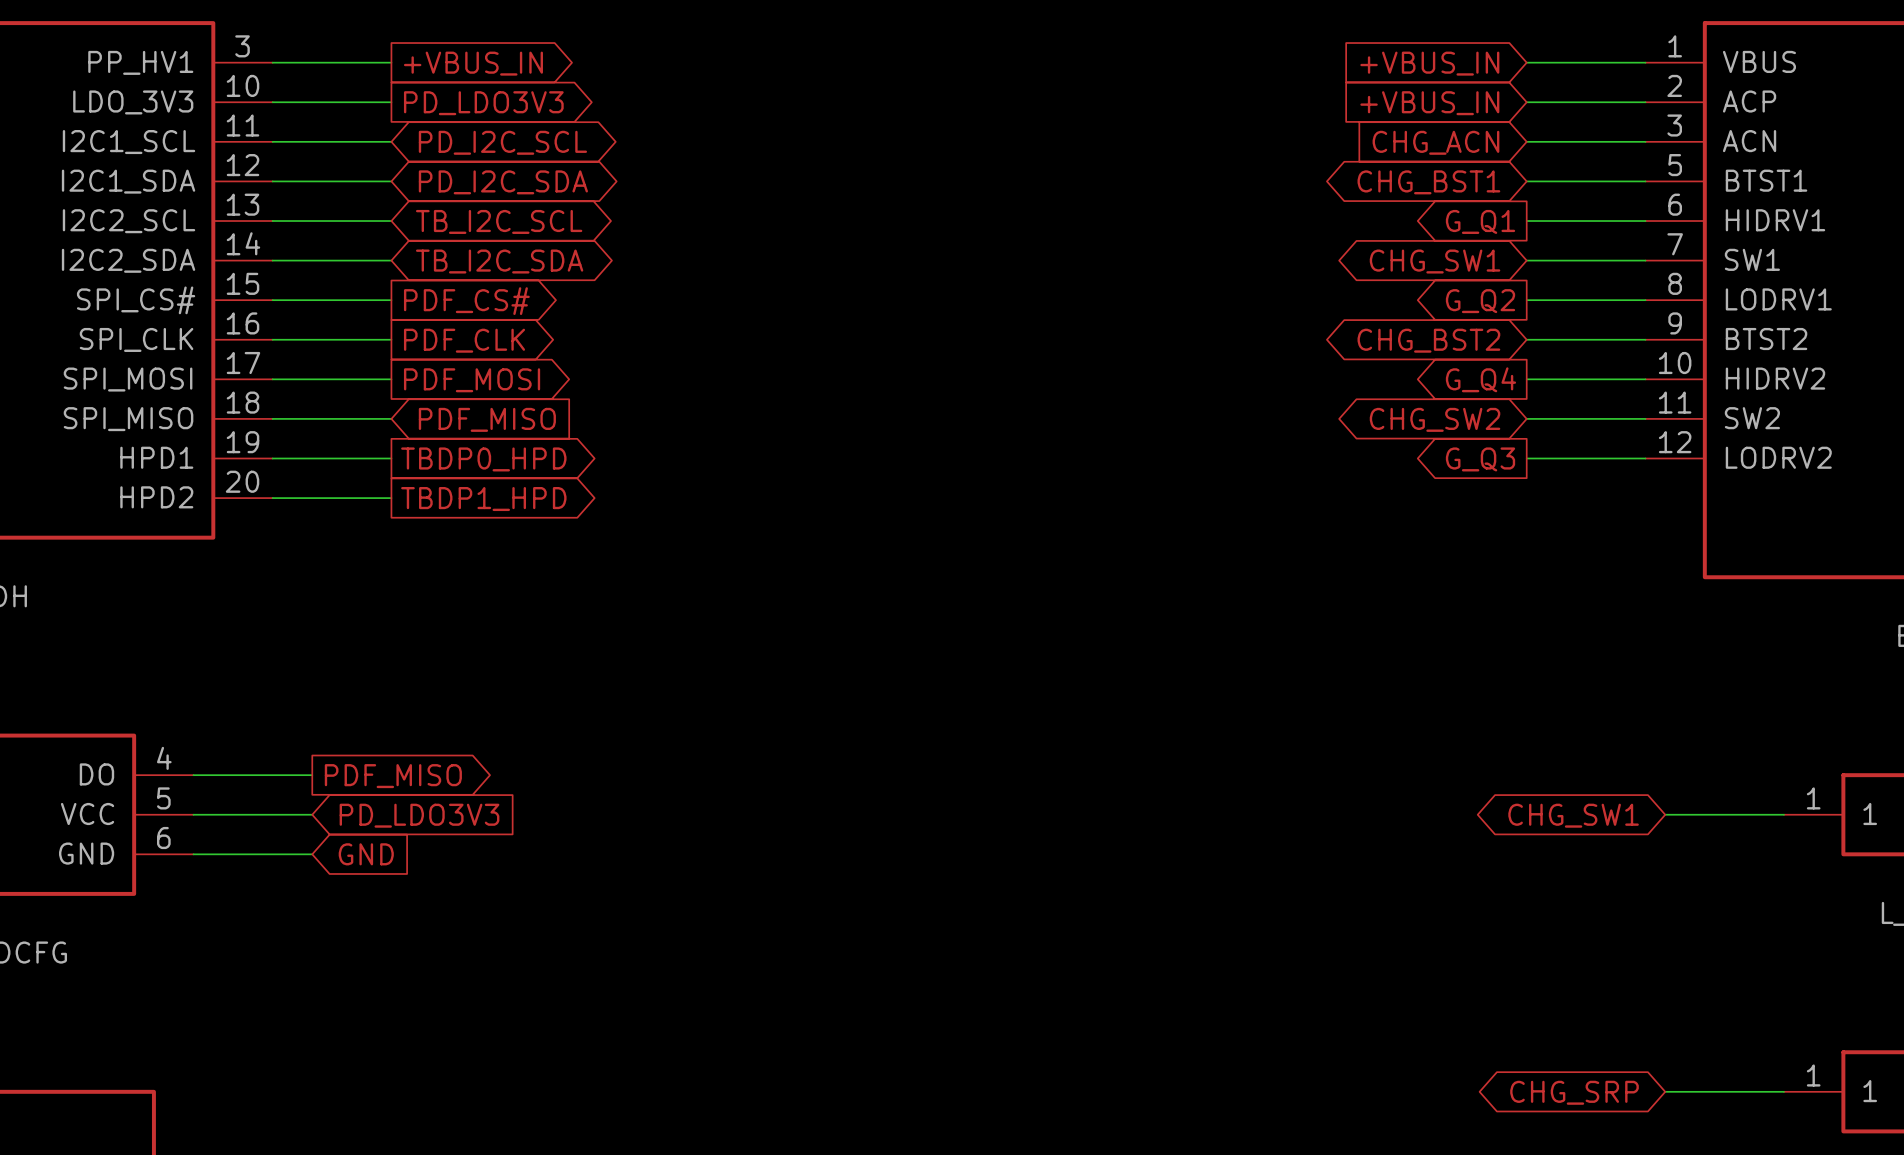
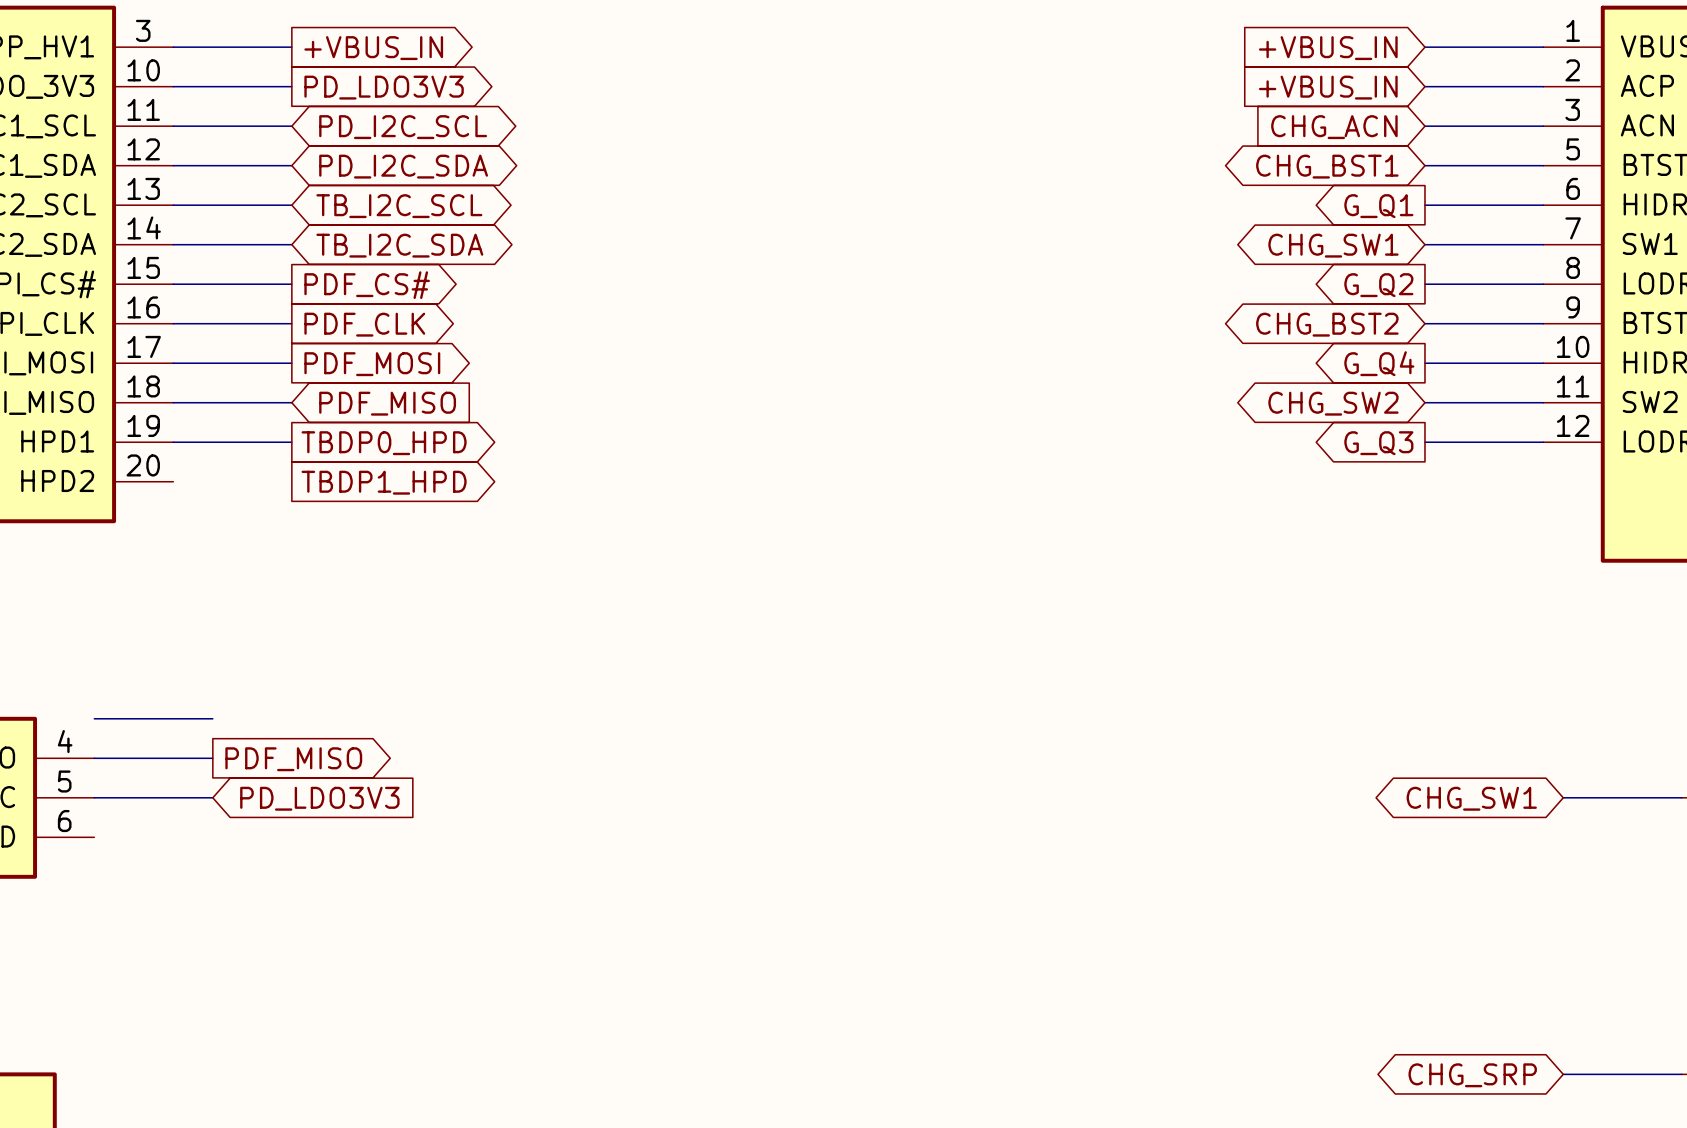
wire: (272, 498) (391, 498) -> none
wire: (193, 854) (312, 854) -> (94, 718) (212, 718)
global label: GND (366, 854) -> none

